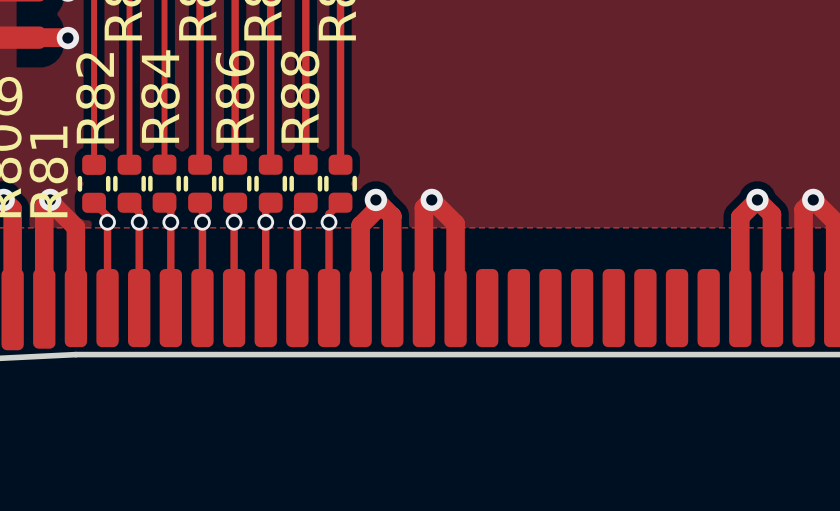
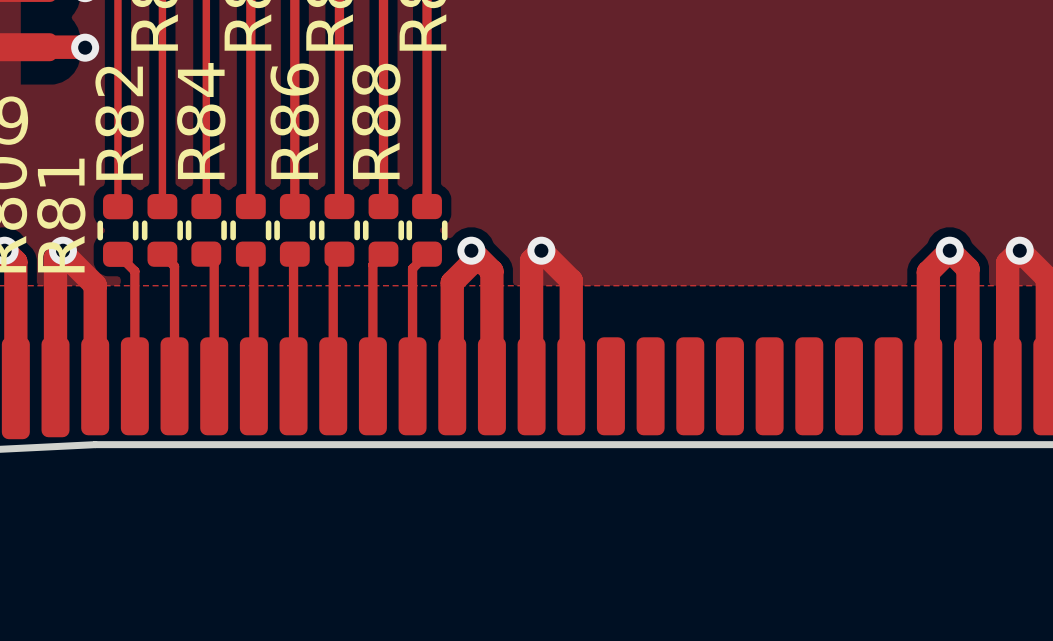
via: (107, 222) -> none
via: (139, 222) -> none
via: (170, 222) -> none
via: (202, 222) -> none
via: (234, 222) -> none
via: (265, 222) -> none
via: (297, 222) -> none
via: (329, 222) -> none

